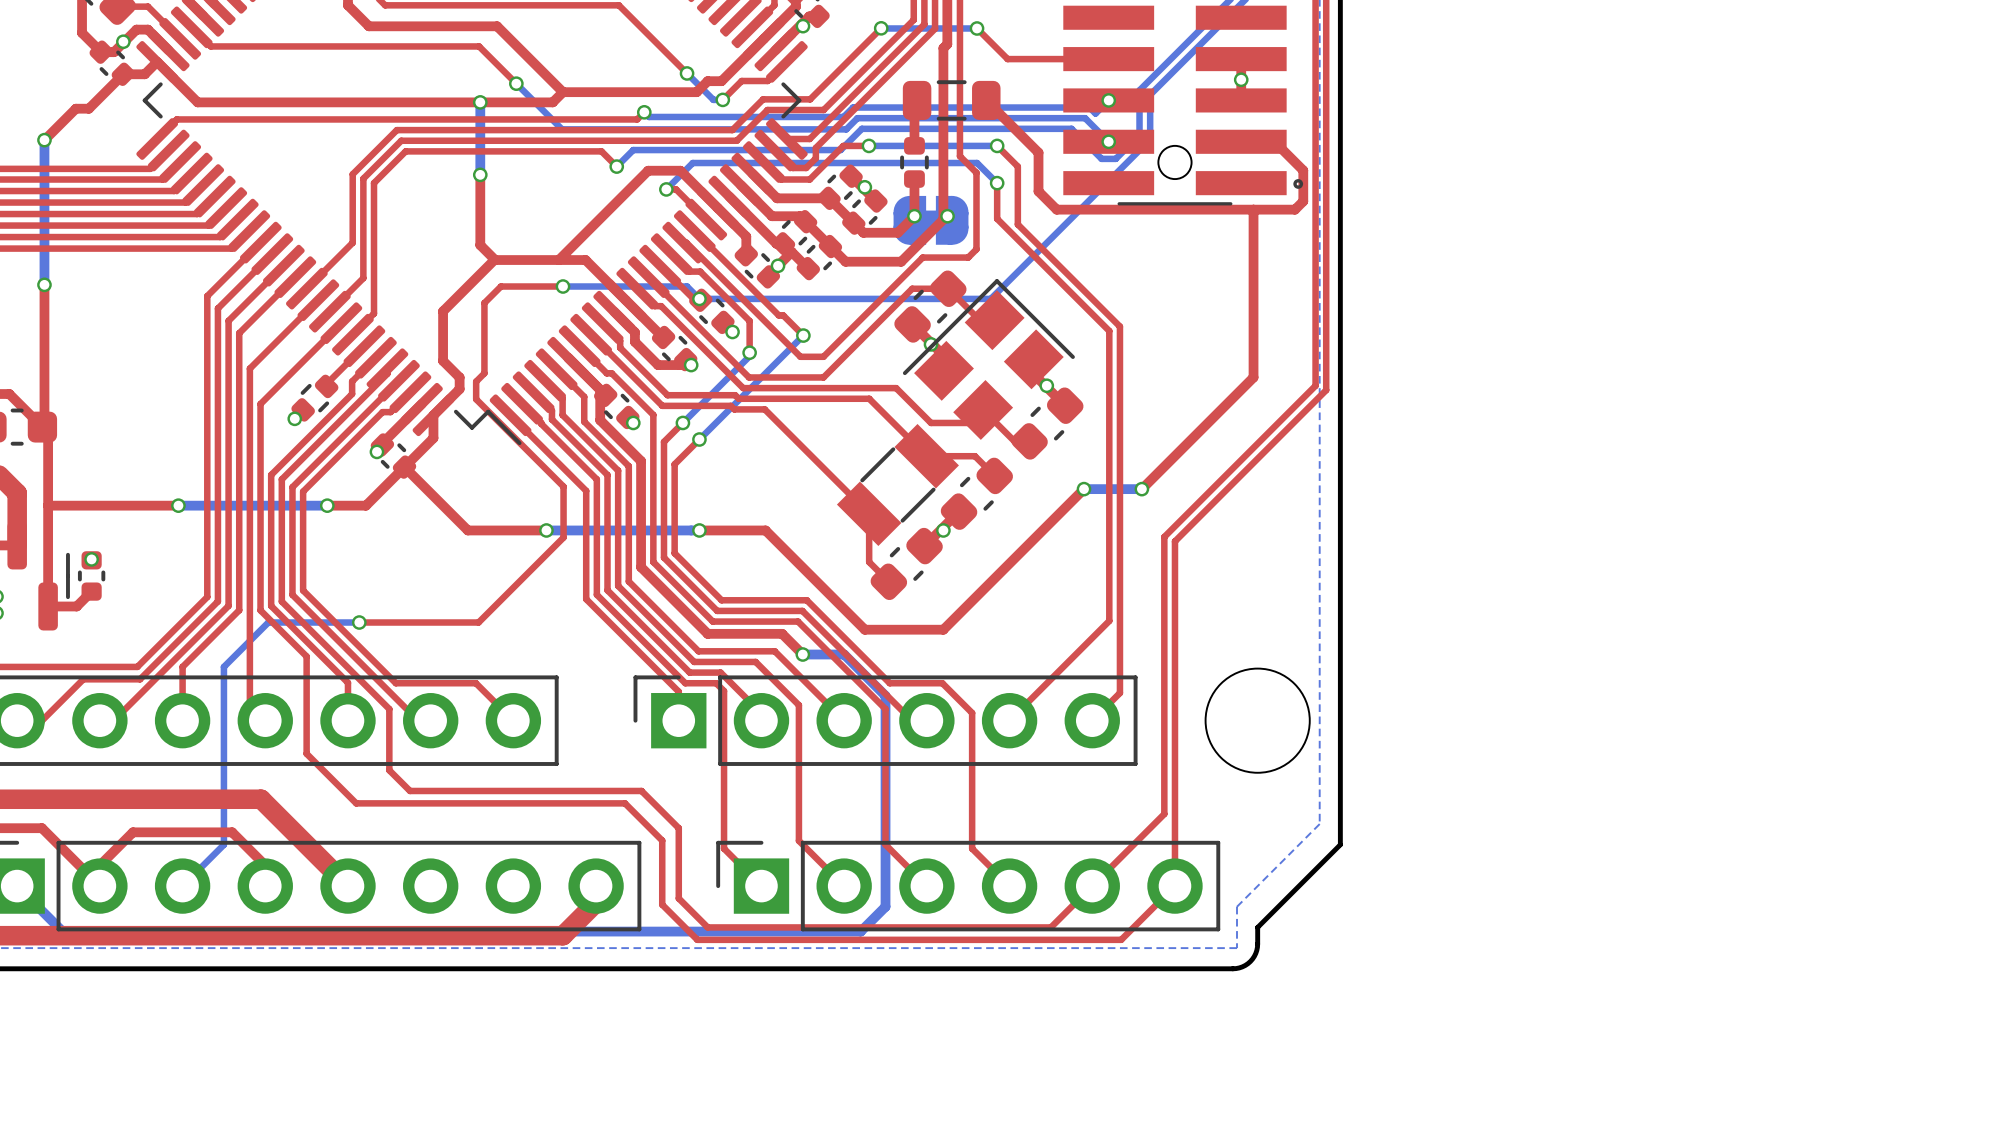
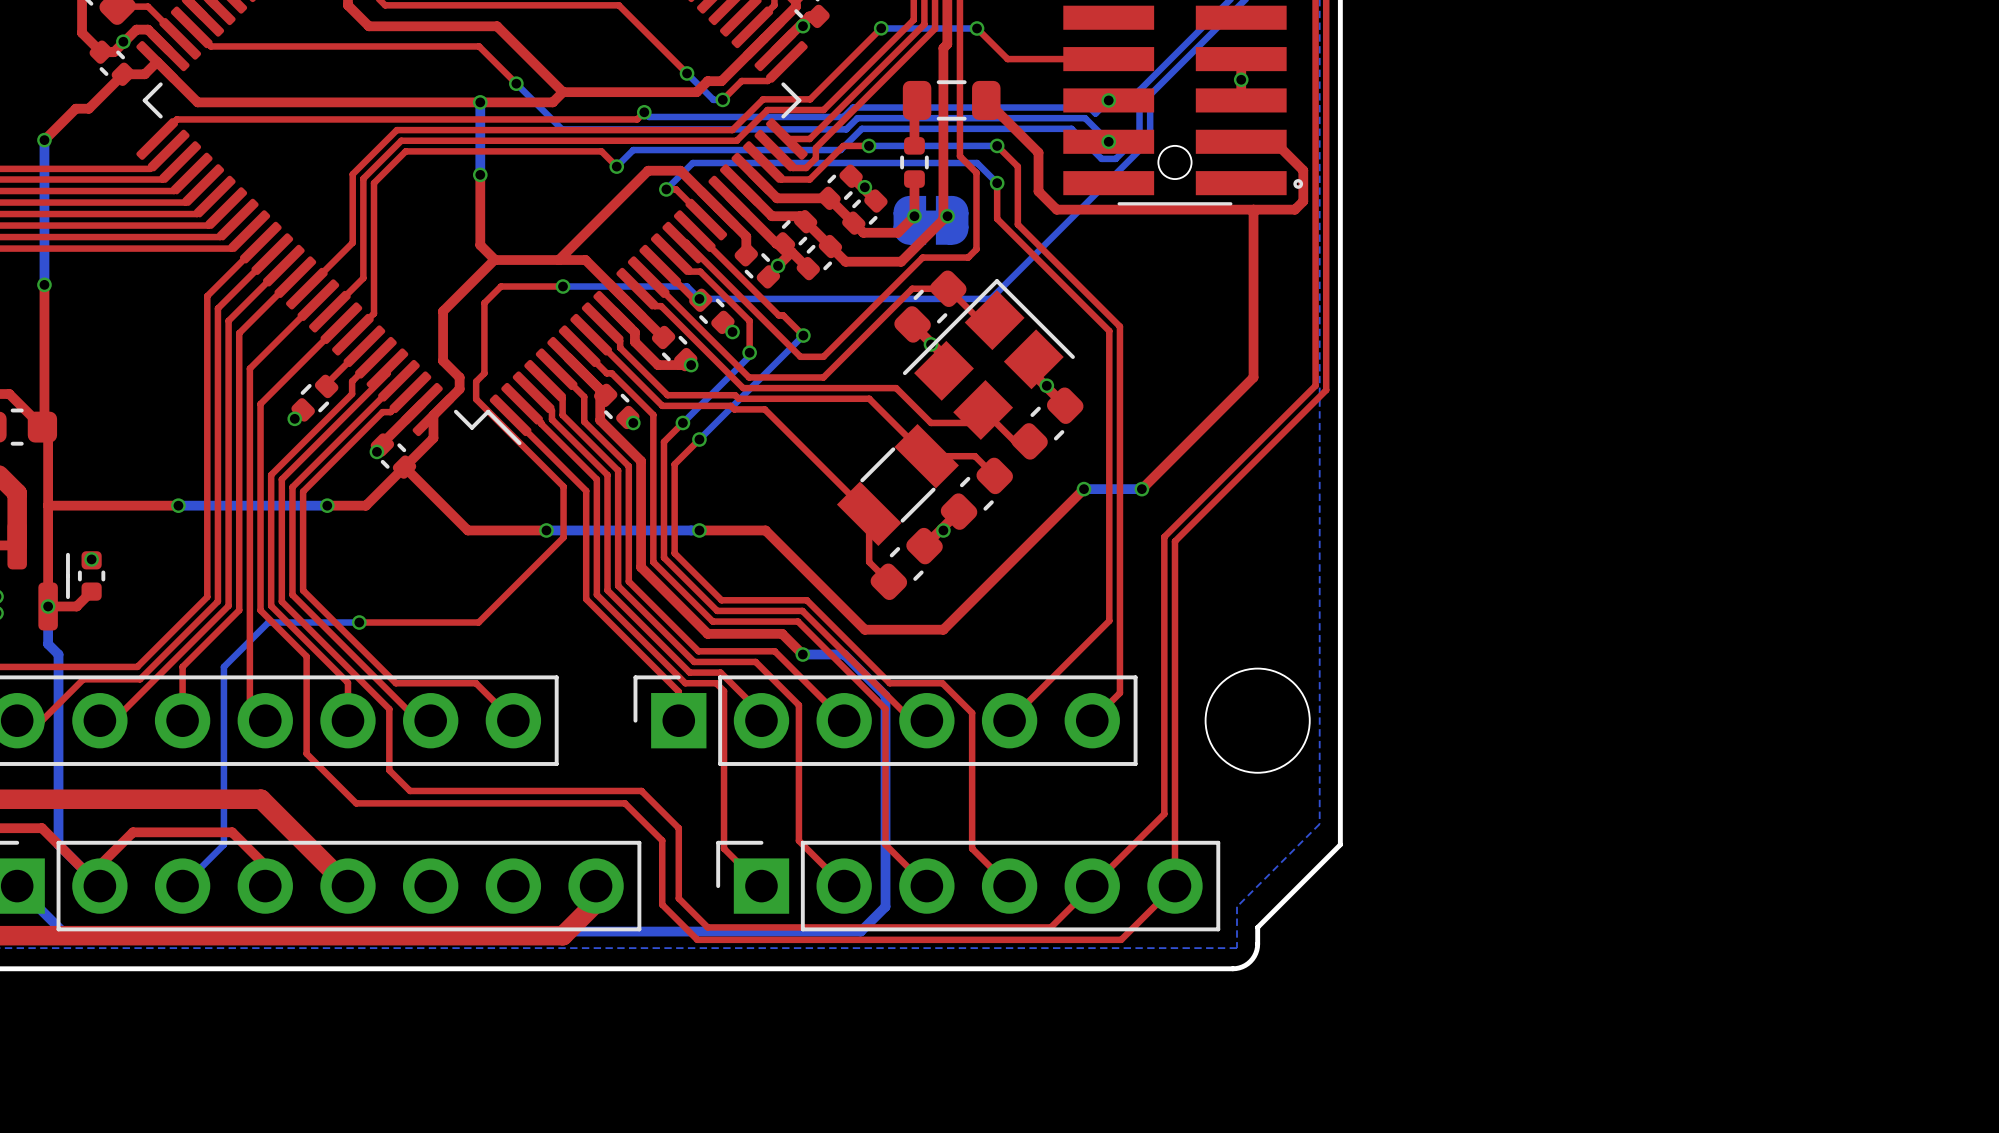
bottom track: none -> (48, 606) (48, 644) (58, 654) (58, 844) (99, 886)
via: none -> (48, 606)

